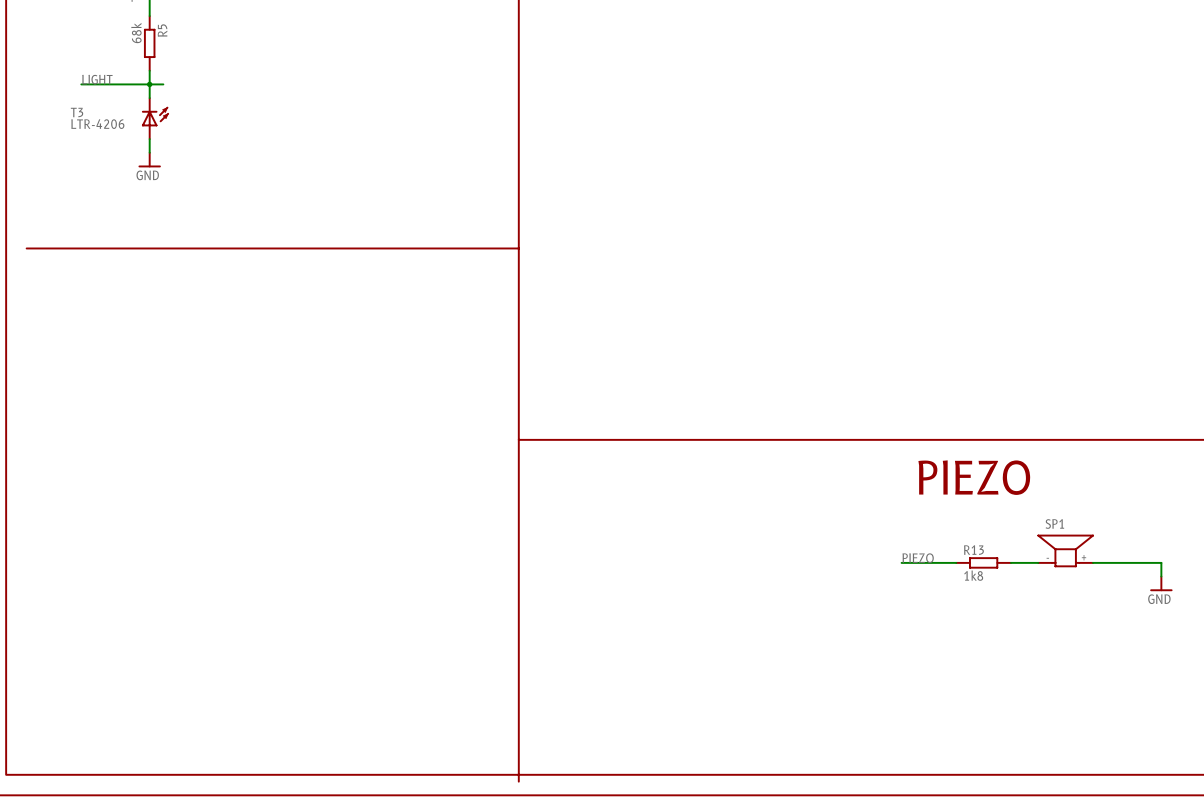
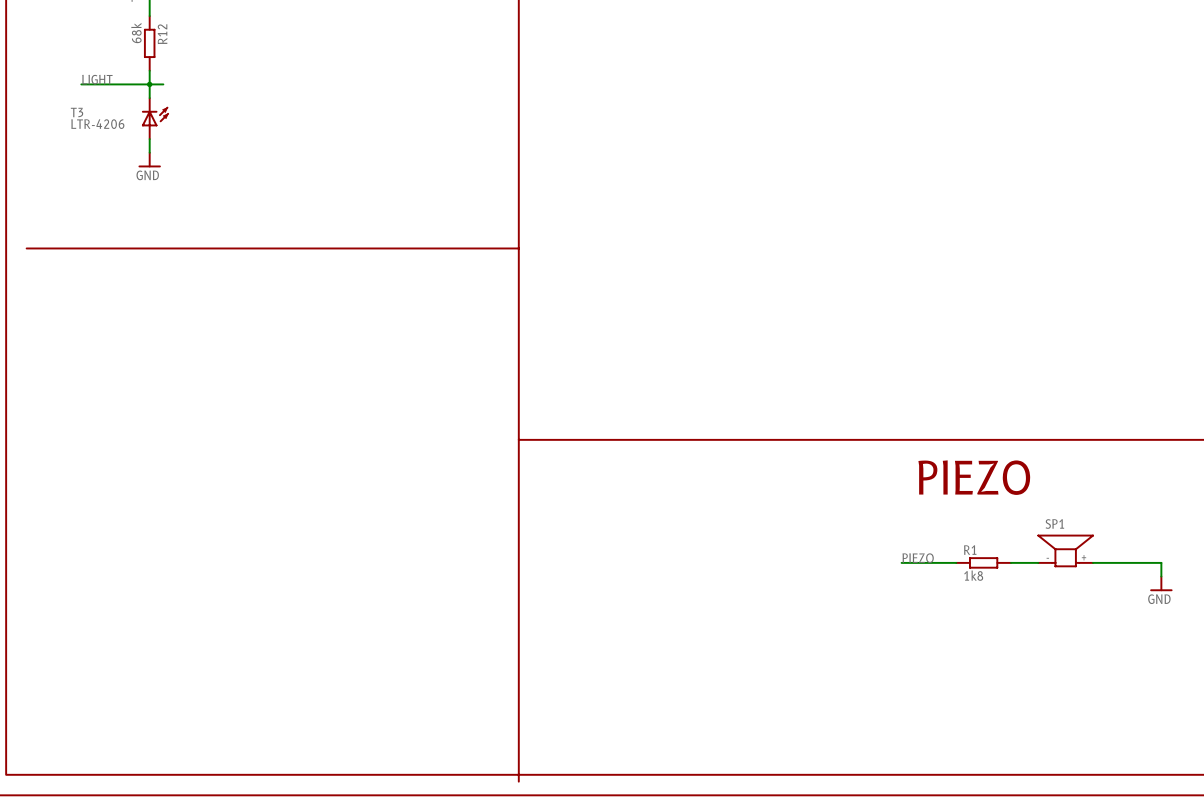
R5 name: R5 (162, 30) -> R12 (162, 34)
R13 name: R13 (973, 550) -> R1 (970, 550)

